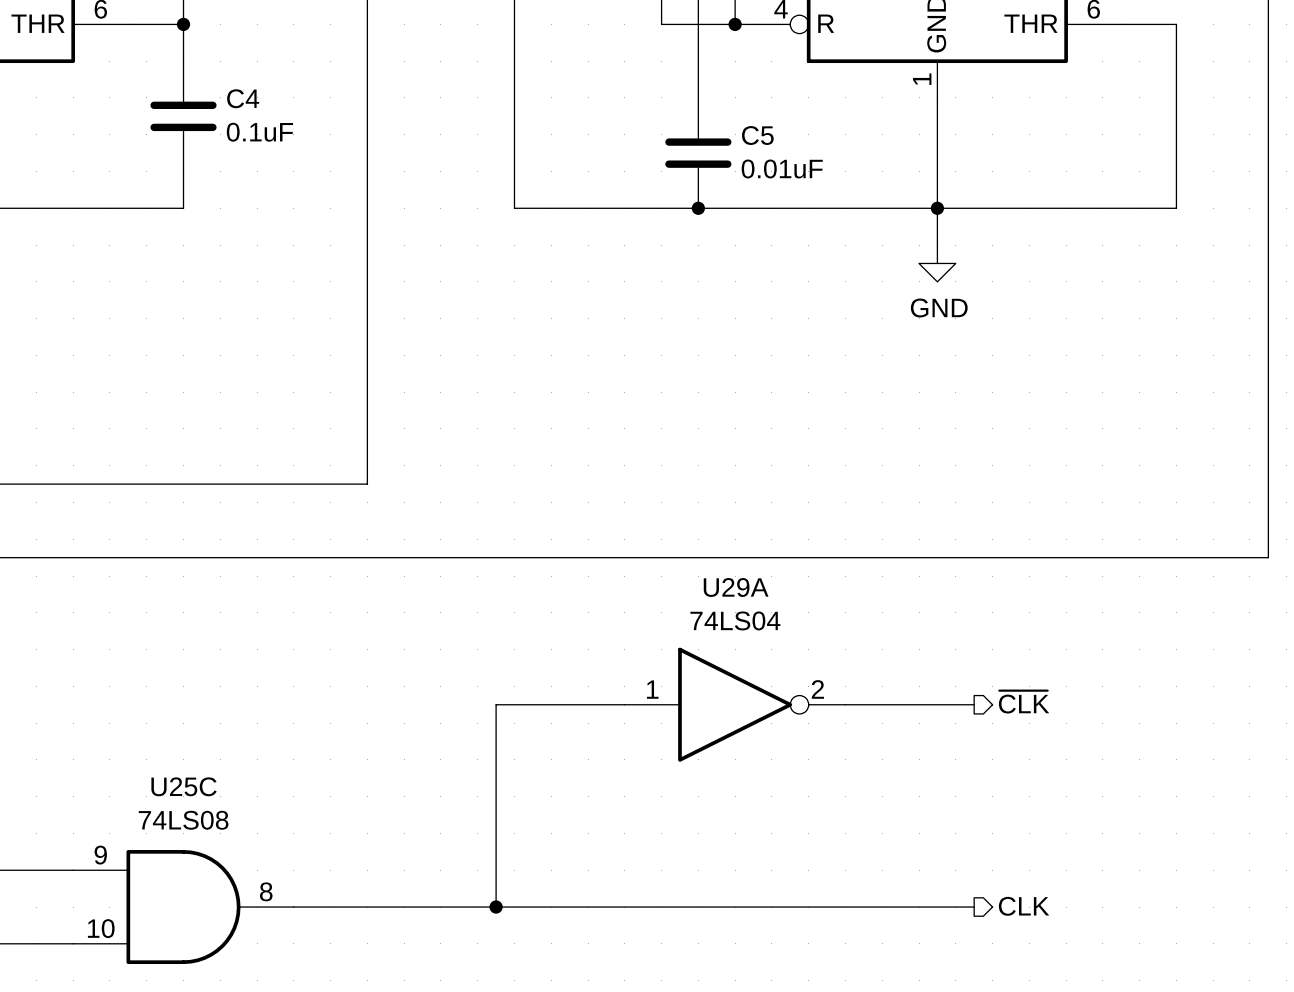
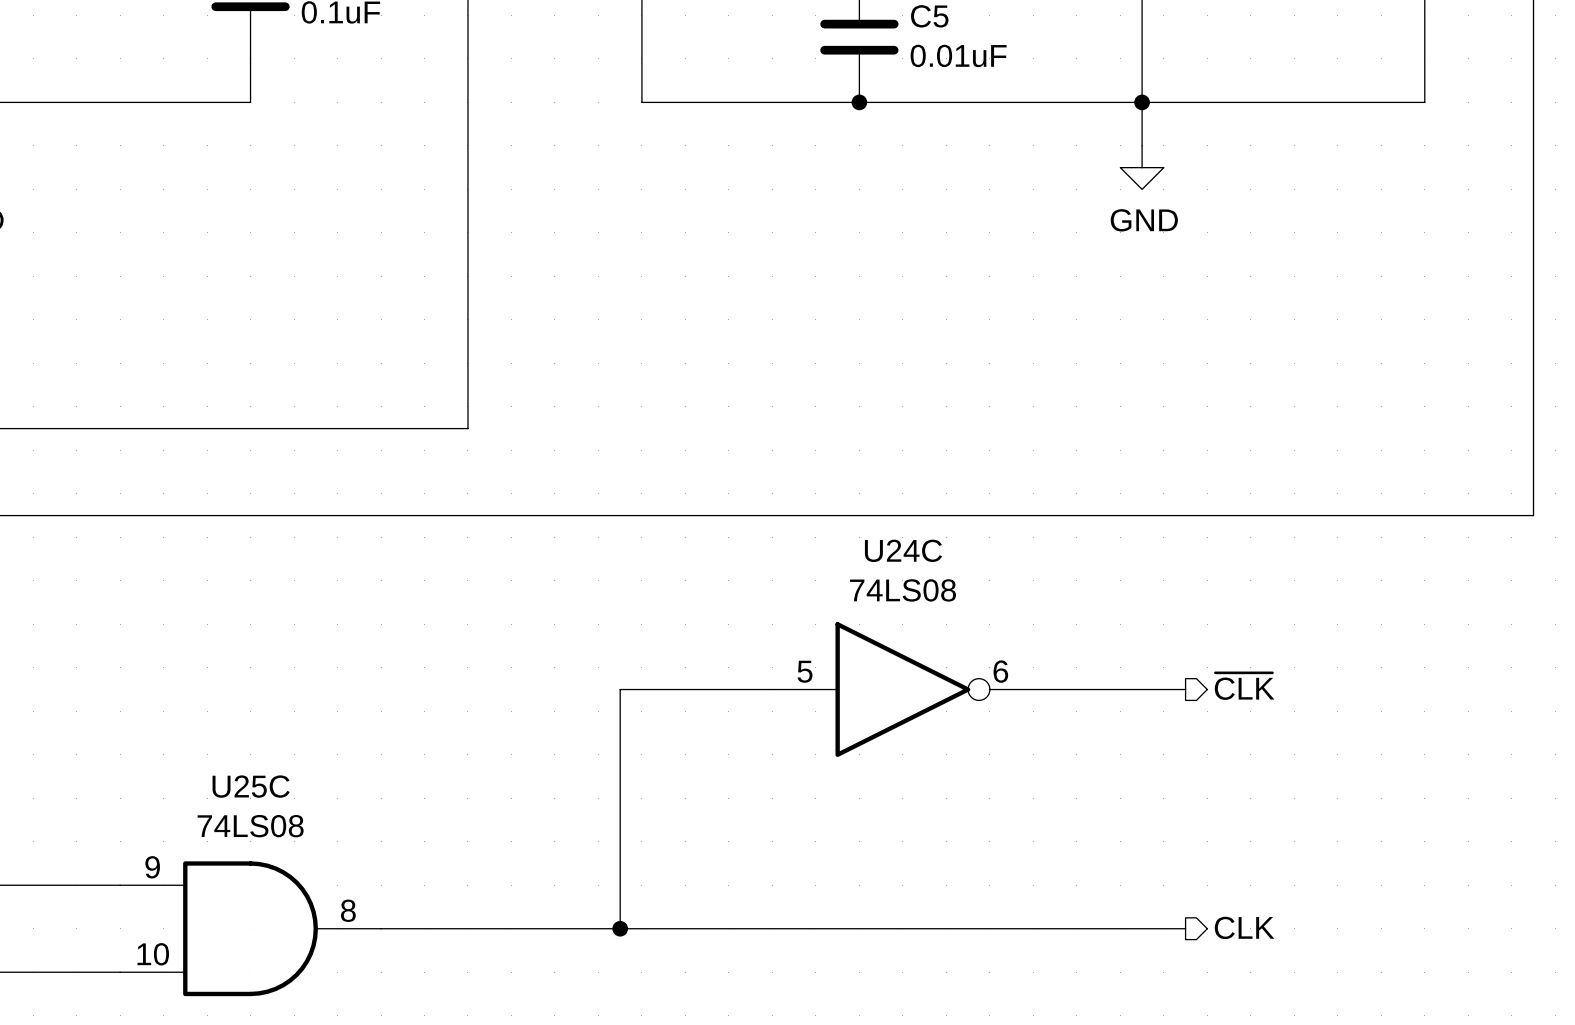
U29A name: U29A (736, 587) -> U24C (903, 550)
U29A value: 74LS04 (735, 620) -> 74LS08 (903, 590)
U29A pin number: 1 (652, 689) -> 5 (805, 671)
U29A pin number: 2 (817, 689) -> 6 (1000, 671)

